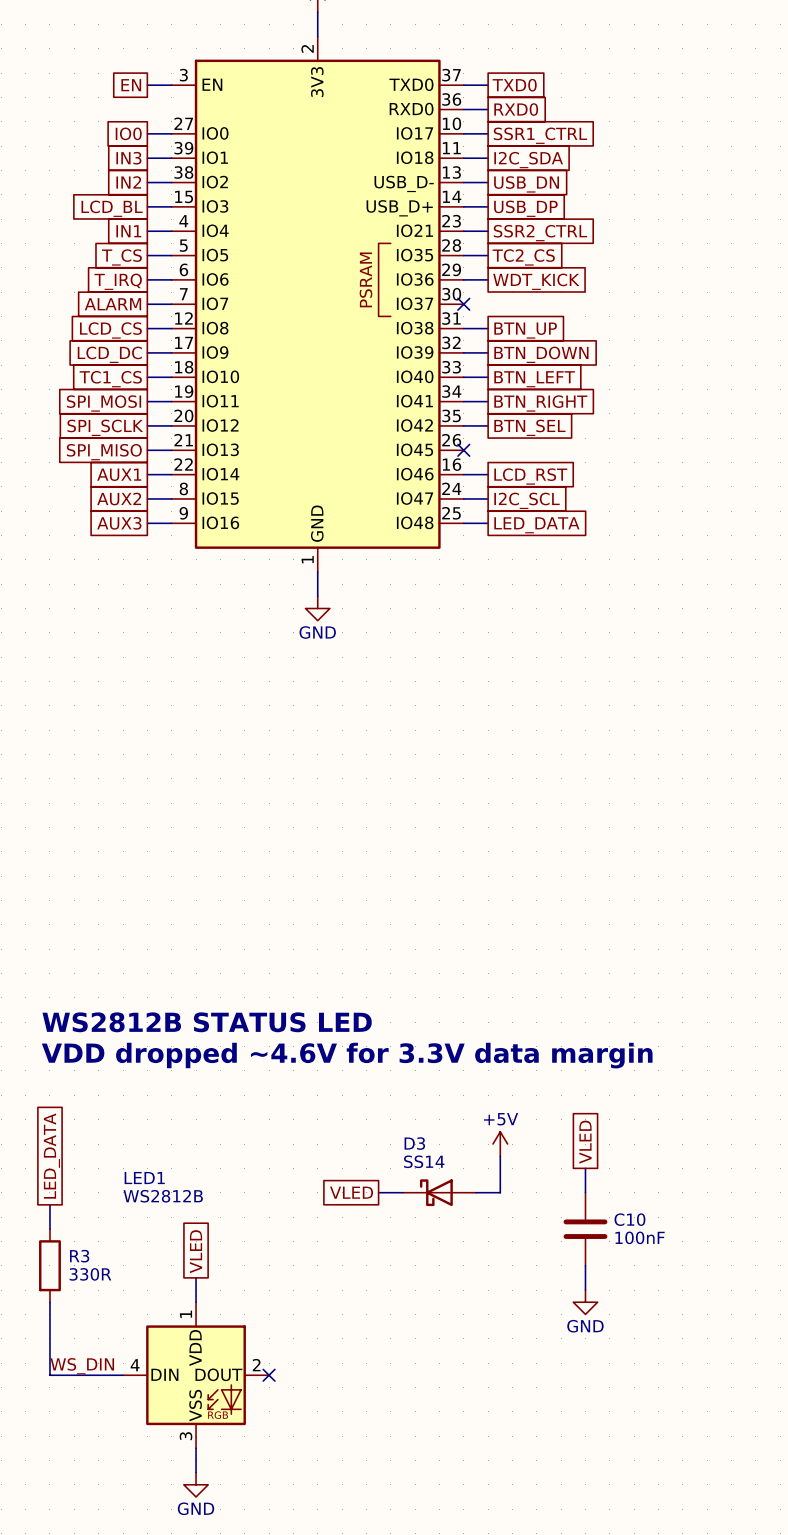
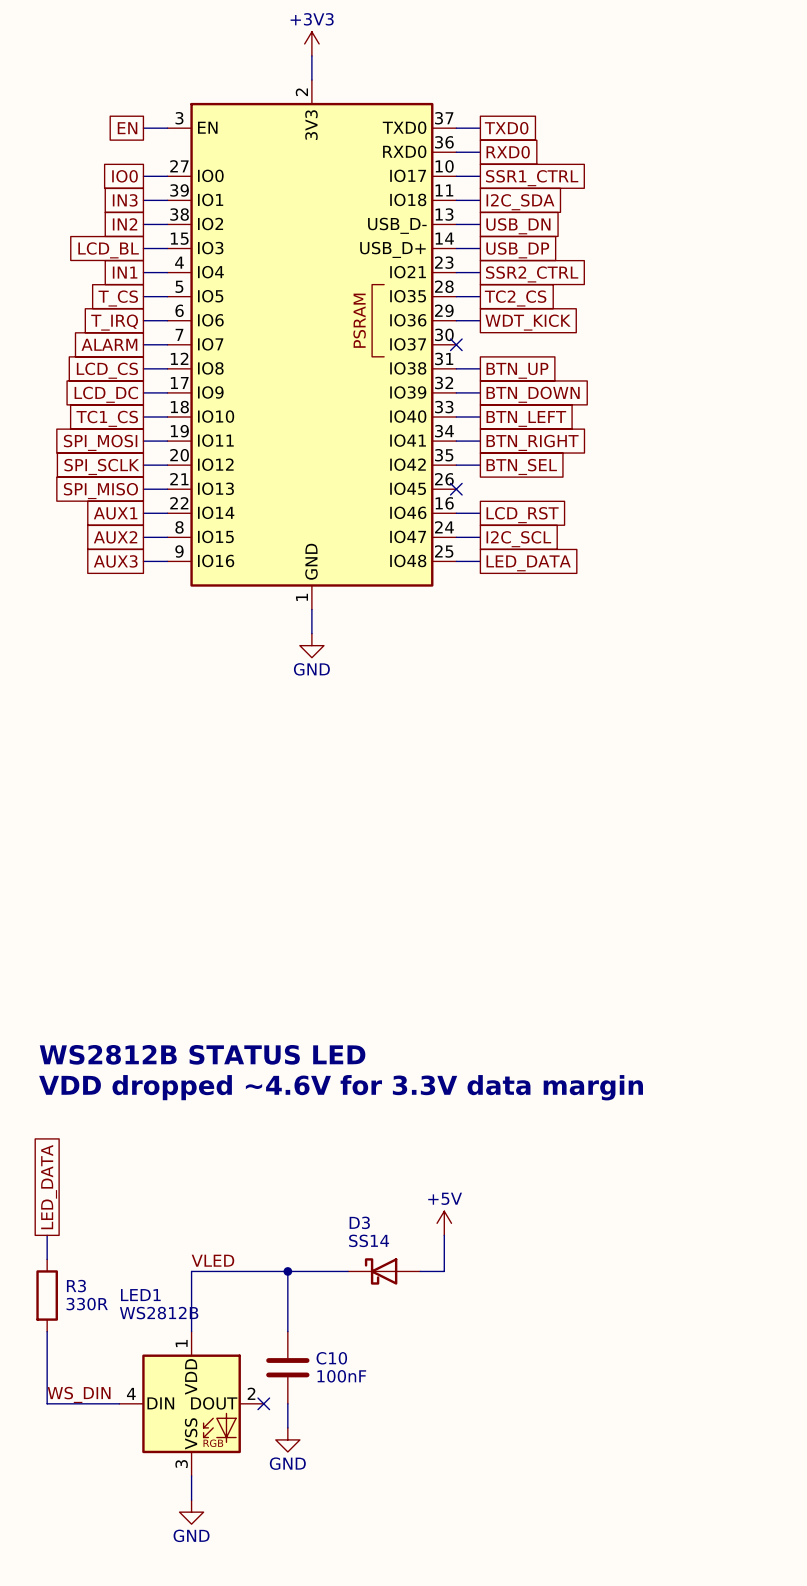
global label: VLED (585, 1142) -> none
power symbol position: +5V (500, 1144) -> +5V (444, 1223)
wire: (500, 1156) (500, 1192) (475, 1192) -> (444, 1235) (444, 1271) (420, 1271)
wire: (585, 1168) (585, 1192) -> none
LED1 name position: LED1 (144, 1178) -> LED1 (140, 1295)
global label: VLED (351, 1192) -> none
wire: (378, 1192) (402, 1192) -> none
D3 position: (439, 1192) -> (384, 1271)
LED1 value position: WS2812B (163, 1196) -> WS2812B (159, 1313)
C10 position: (585, 1229) -> (287, 1367)
label: none -> VLED (212, 1260)
wire: none -> (287, 1271) (287, 1331)
junction: none -> (287, 1271)
wire: none -> (348, 1271) (191, 1271) (191, 1307)
global label: VLED (196, 1251) -> none
wire: (585, 1265) (585, 1290) -> none
power symbol: GND (585, 1302) -> none
wire: none -> (287, 1403) (287, 1427)
power symbol: none -> GND (287, 1439)

